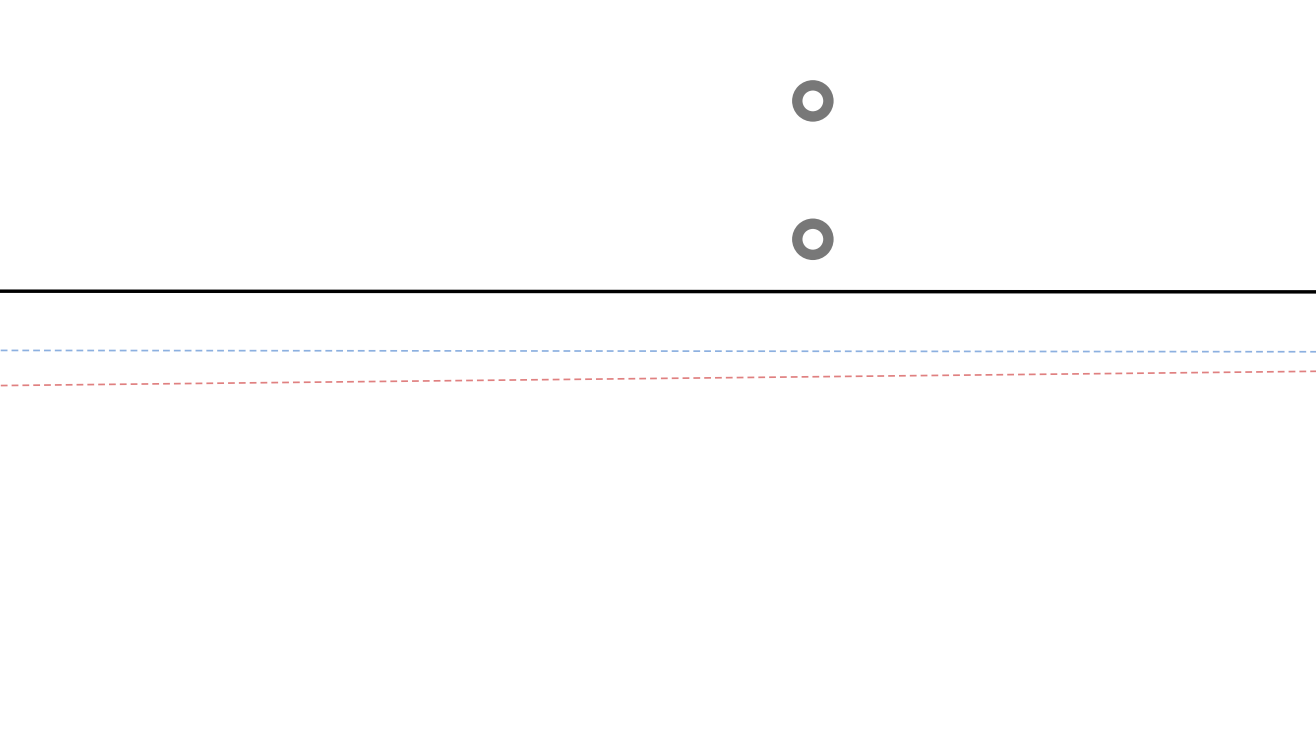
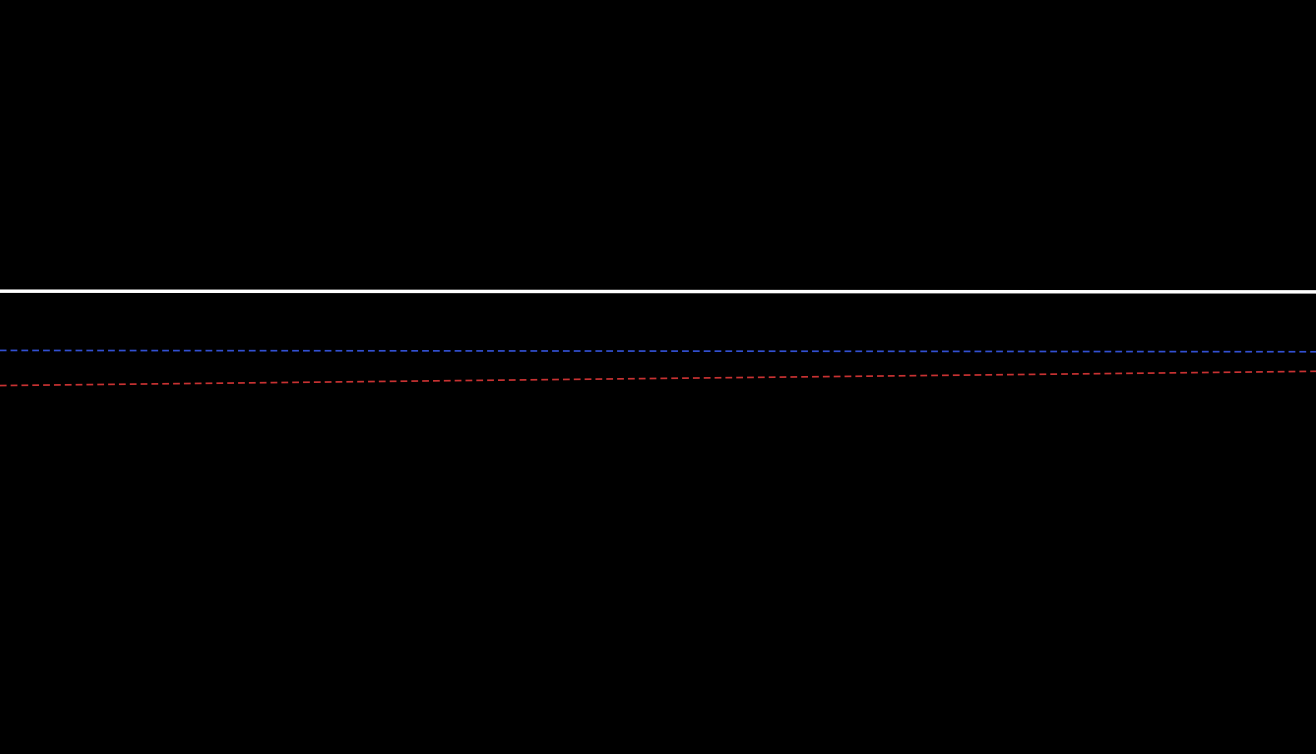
via: (812, 100) -> none
via: (812, 239) -> none

